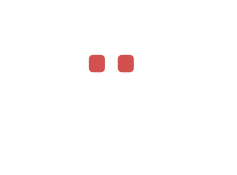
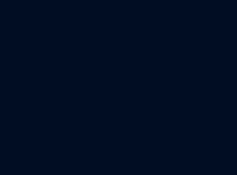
part: (111, 63) -> none

